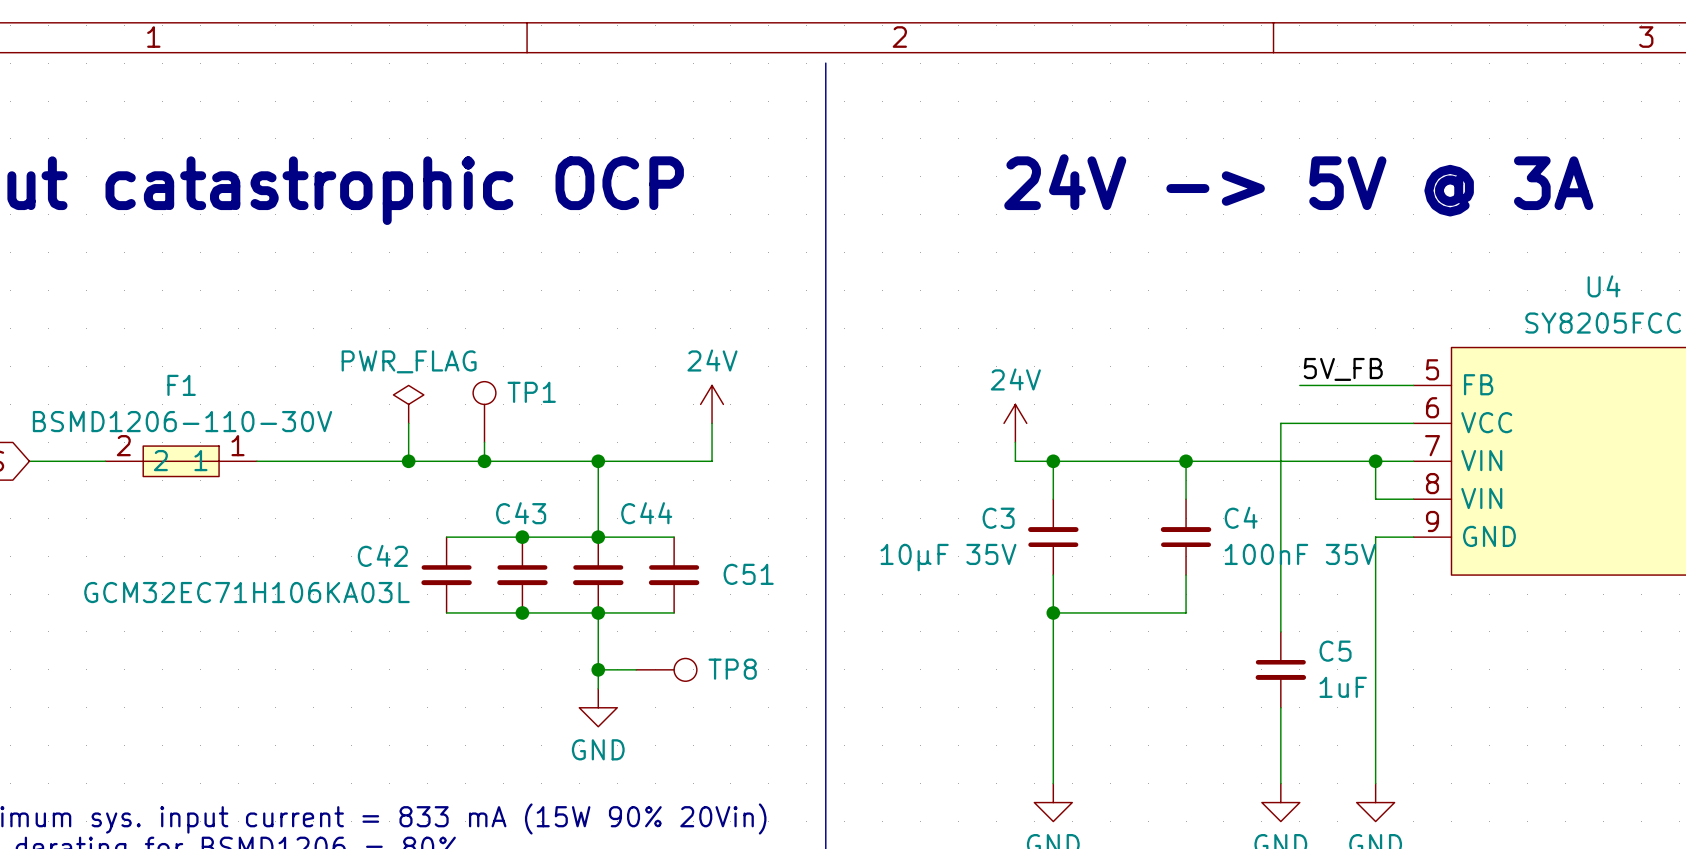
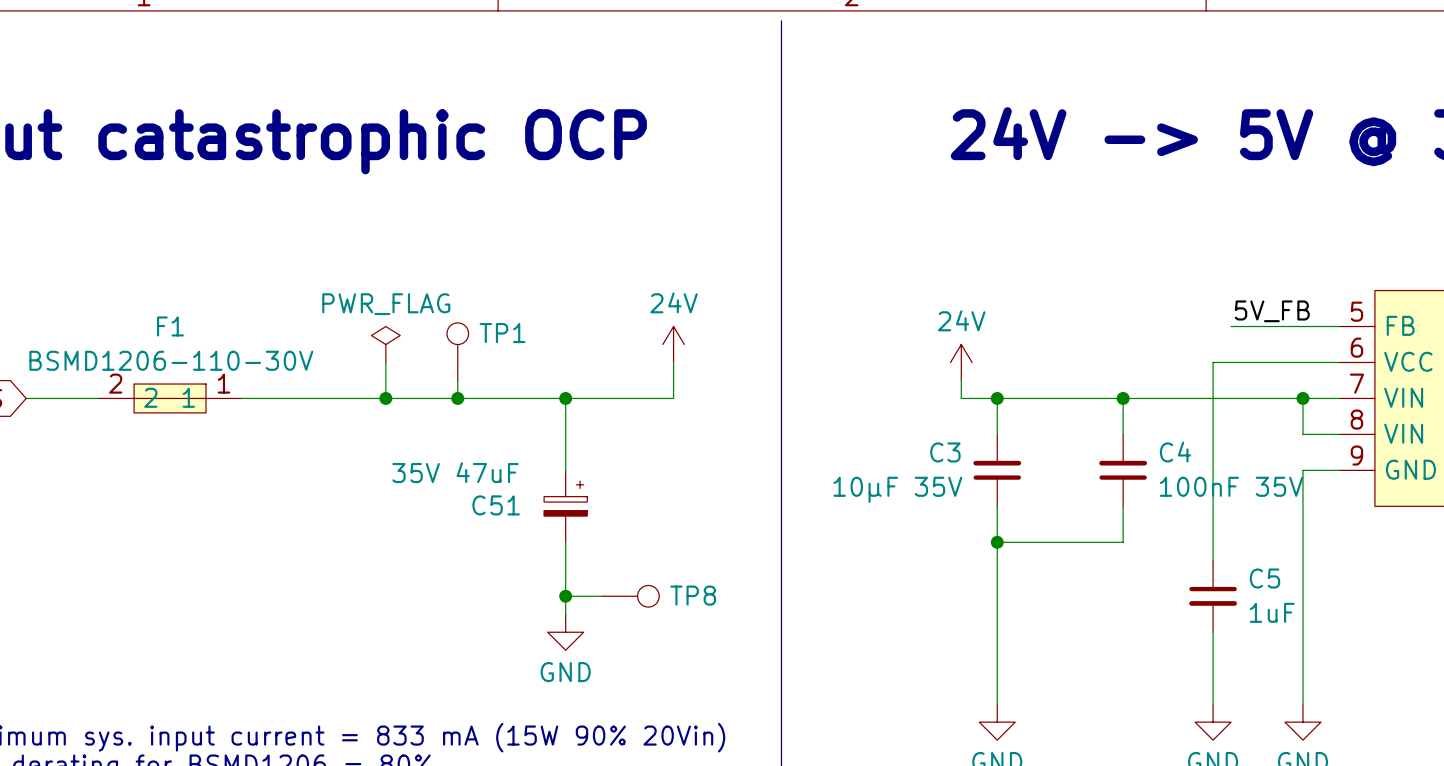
wire: (446, 537) (674, 537) -> none
junction: (522, 537) -> none
junction: (598, 537) -> none
C51 symbol: [648, 537, 700, 613] -> [544, 470, 588, 543]
C51 value: none -> 35V 47uF (455, 472)
C51 name position: C51 (748, 574) -> C51 (496, 505)
C42: GCM32EC71H106KA03L (446, 575) -> none
C43: (522, 575) -> none
C44: (598, 575) -> none
wire: (446, 612) (674, 612) -> none
junction: (522, 612) -> none
junction: (598, 612) -> none

